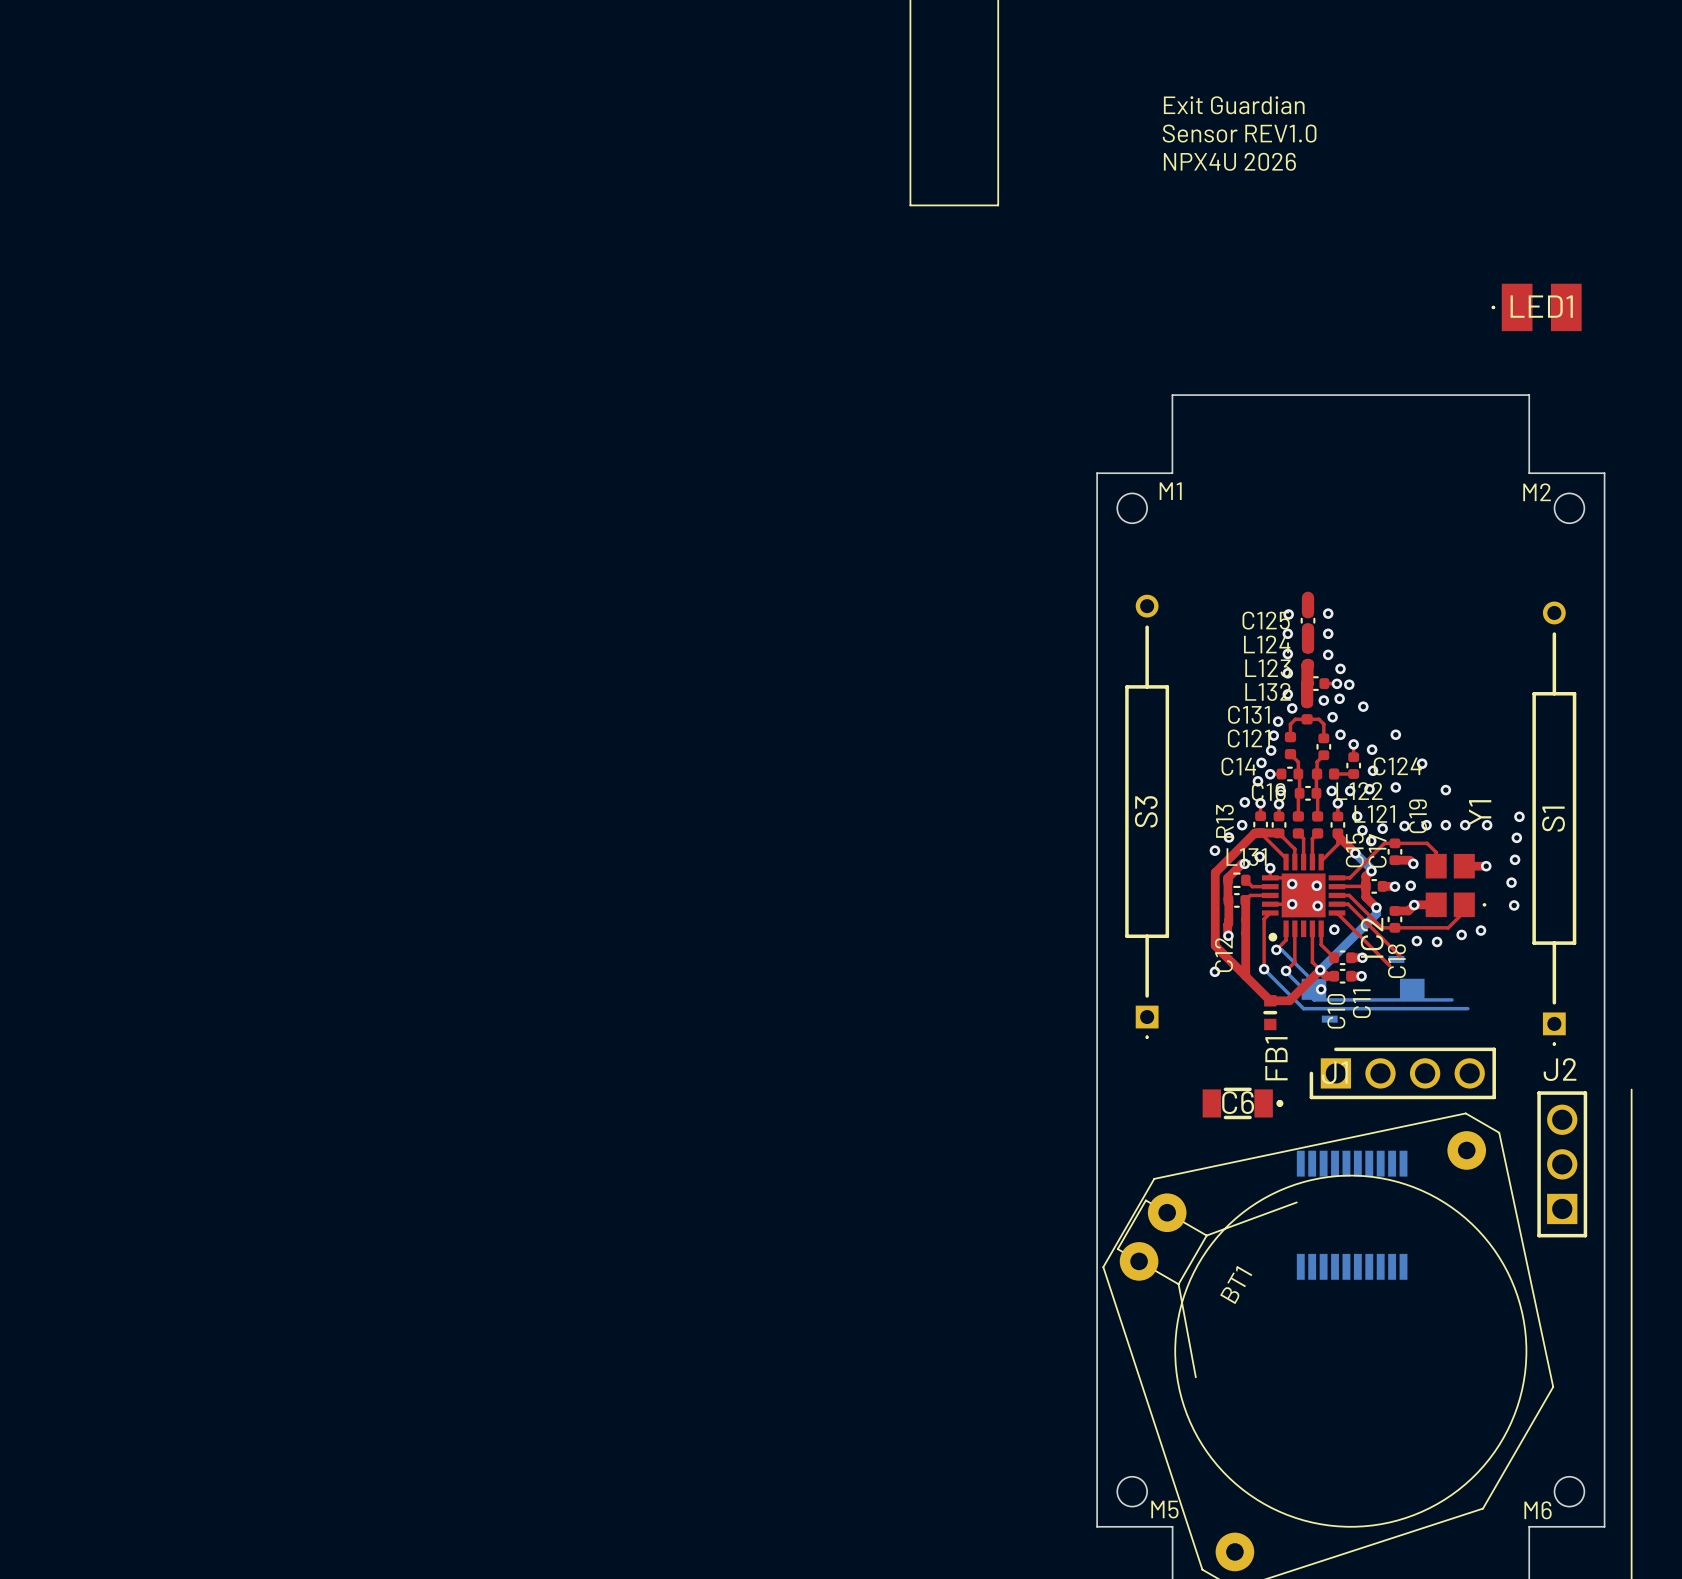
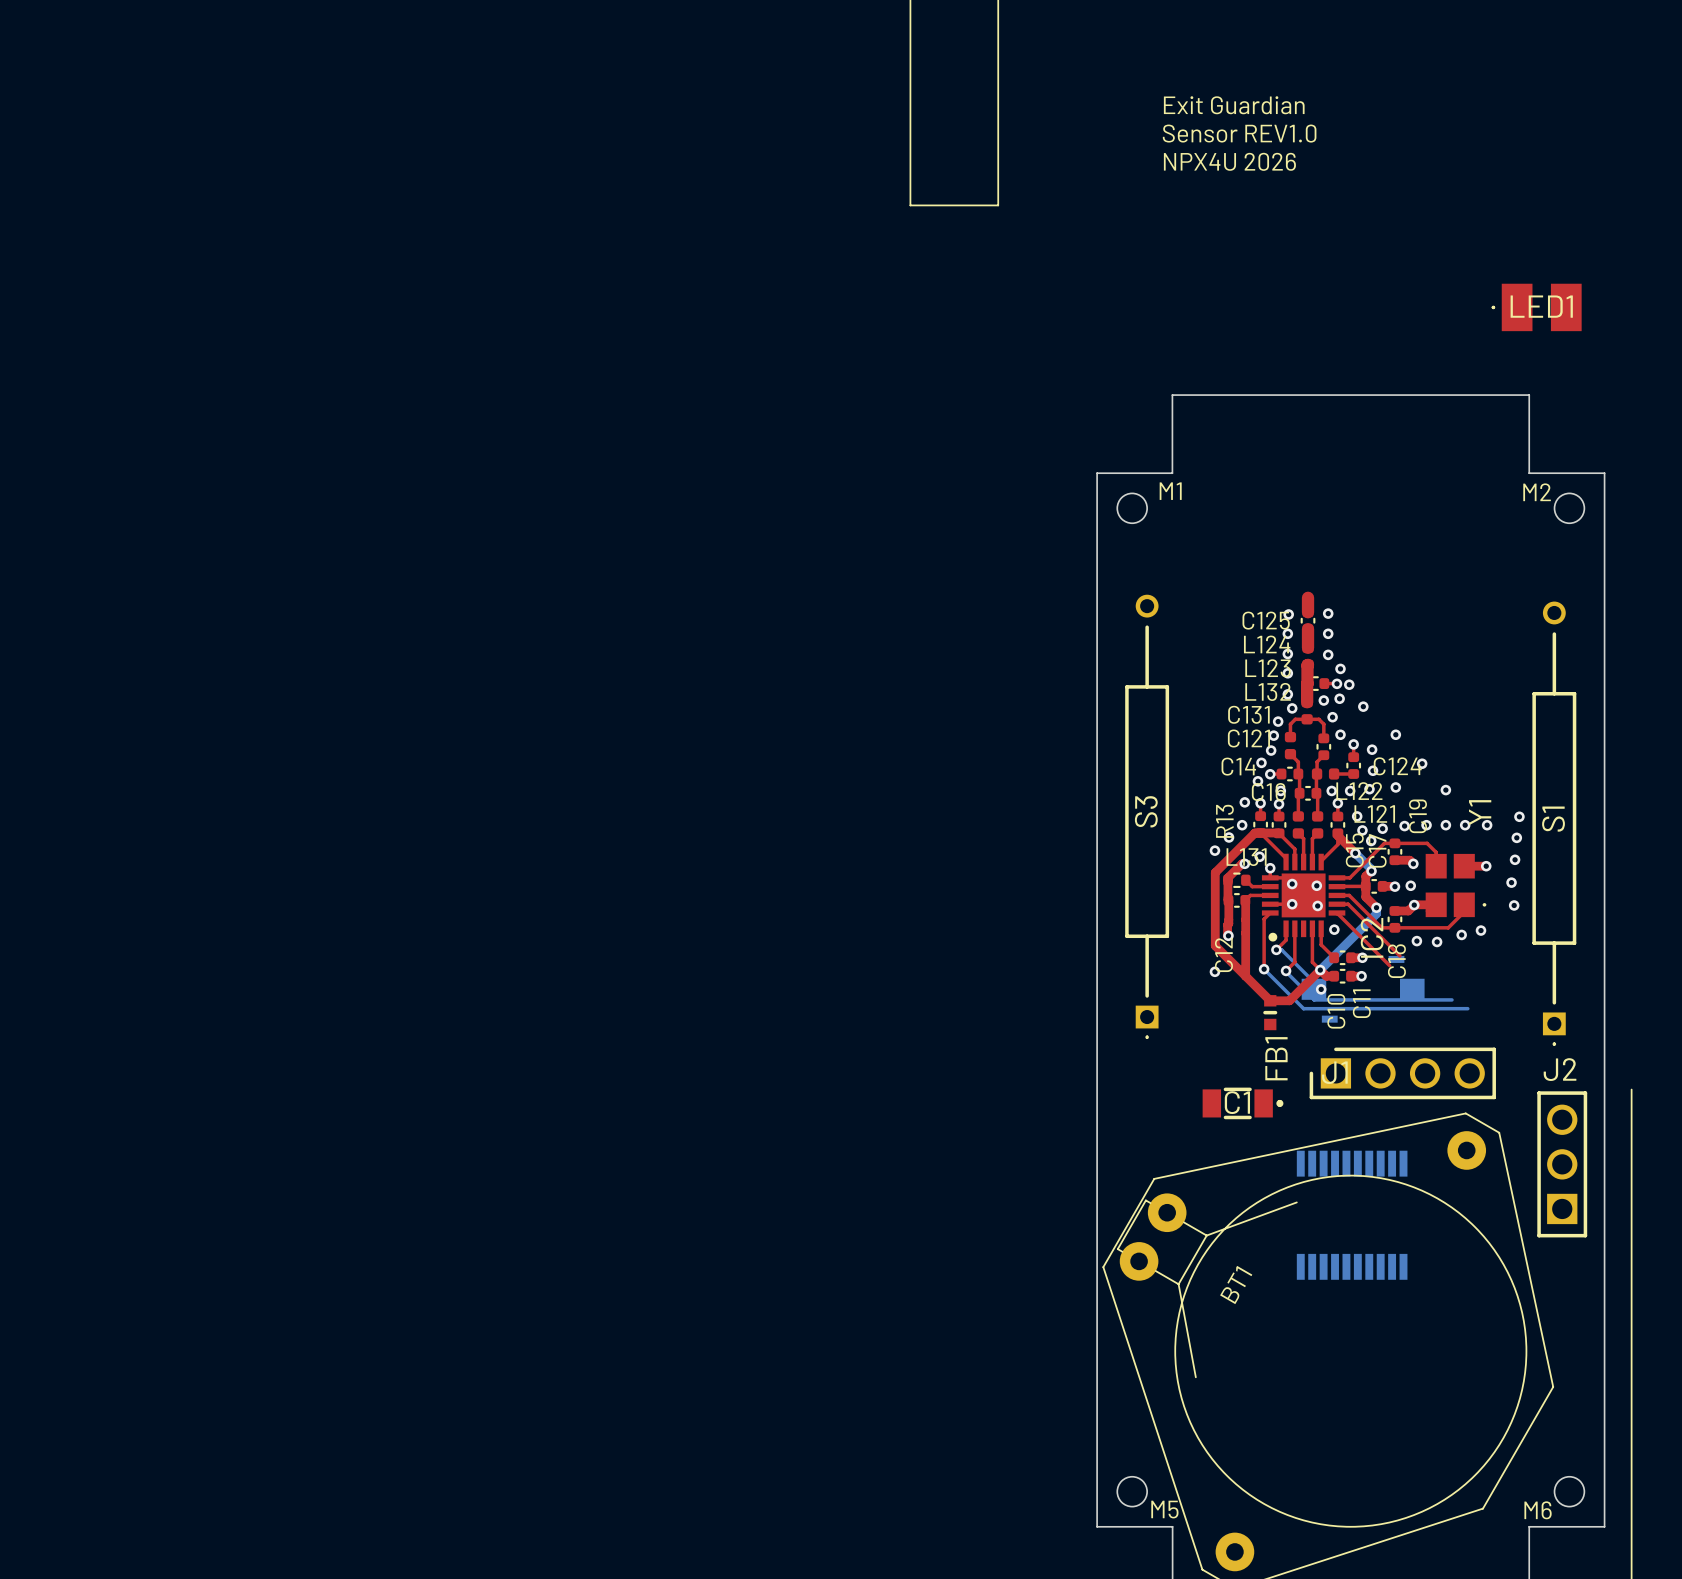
C6 name: C6 (1238, 1102) -> C1 (1237, 1102)

